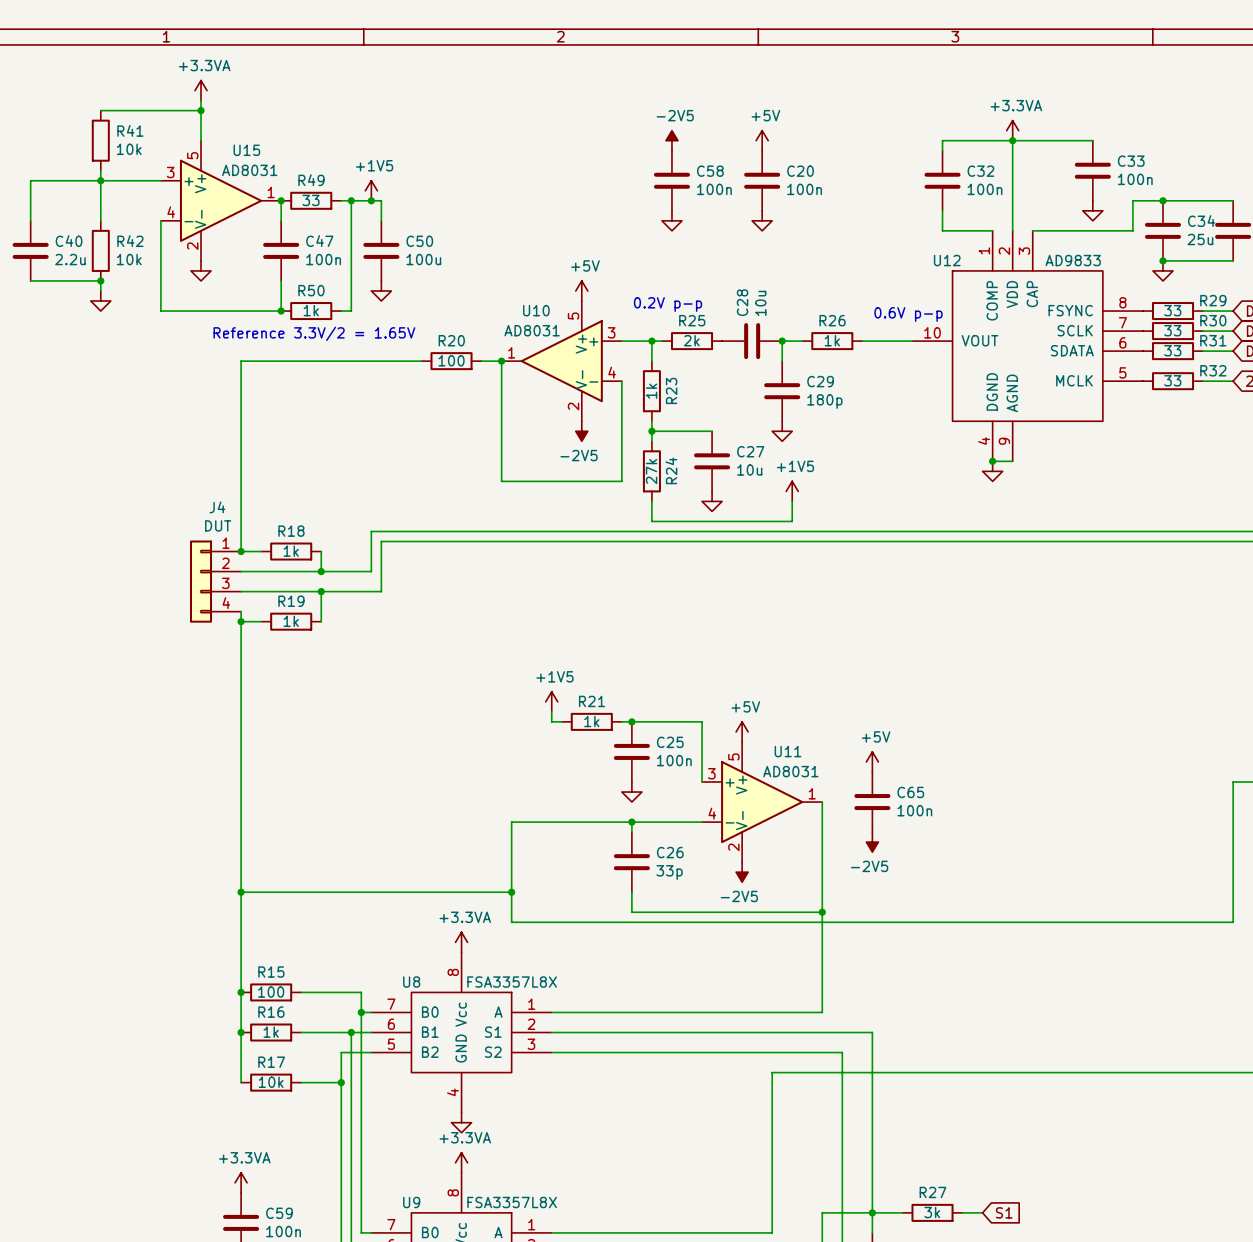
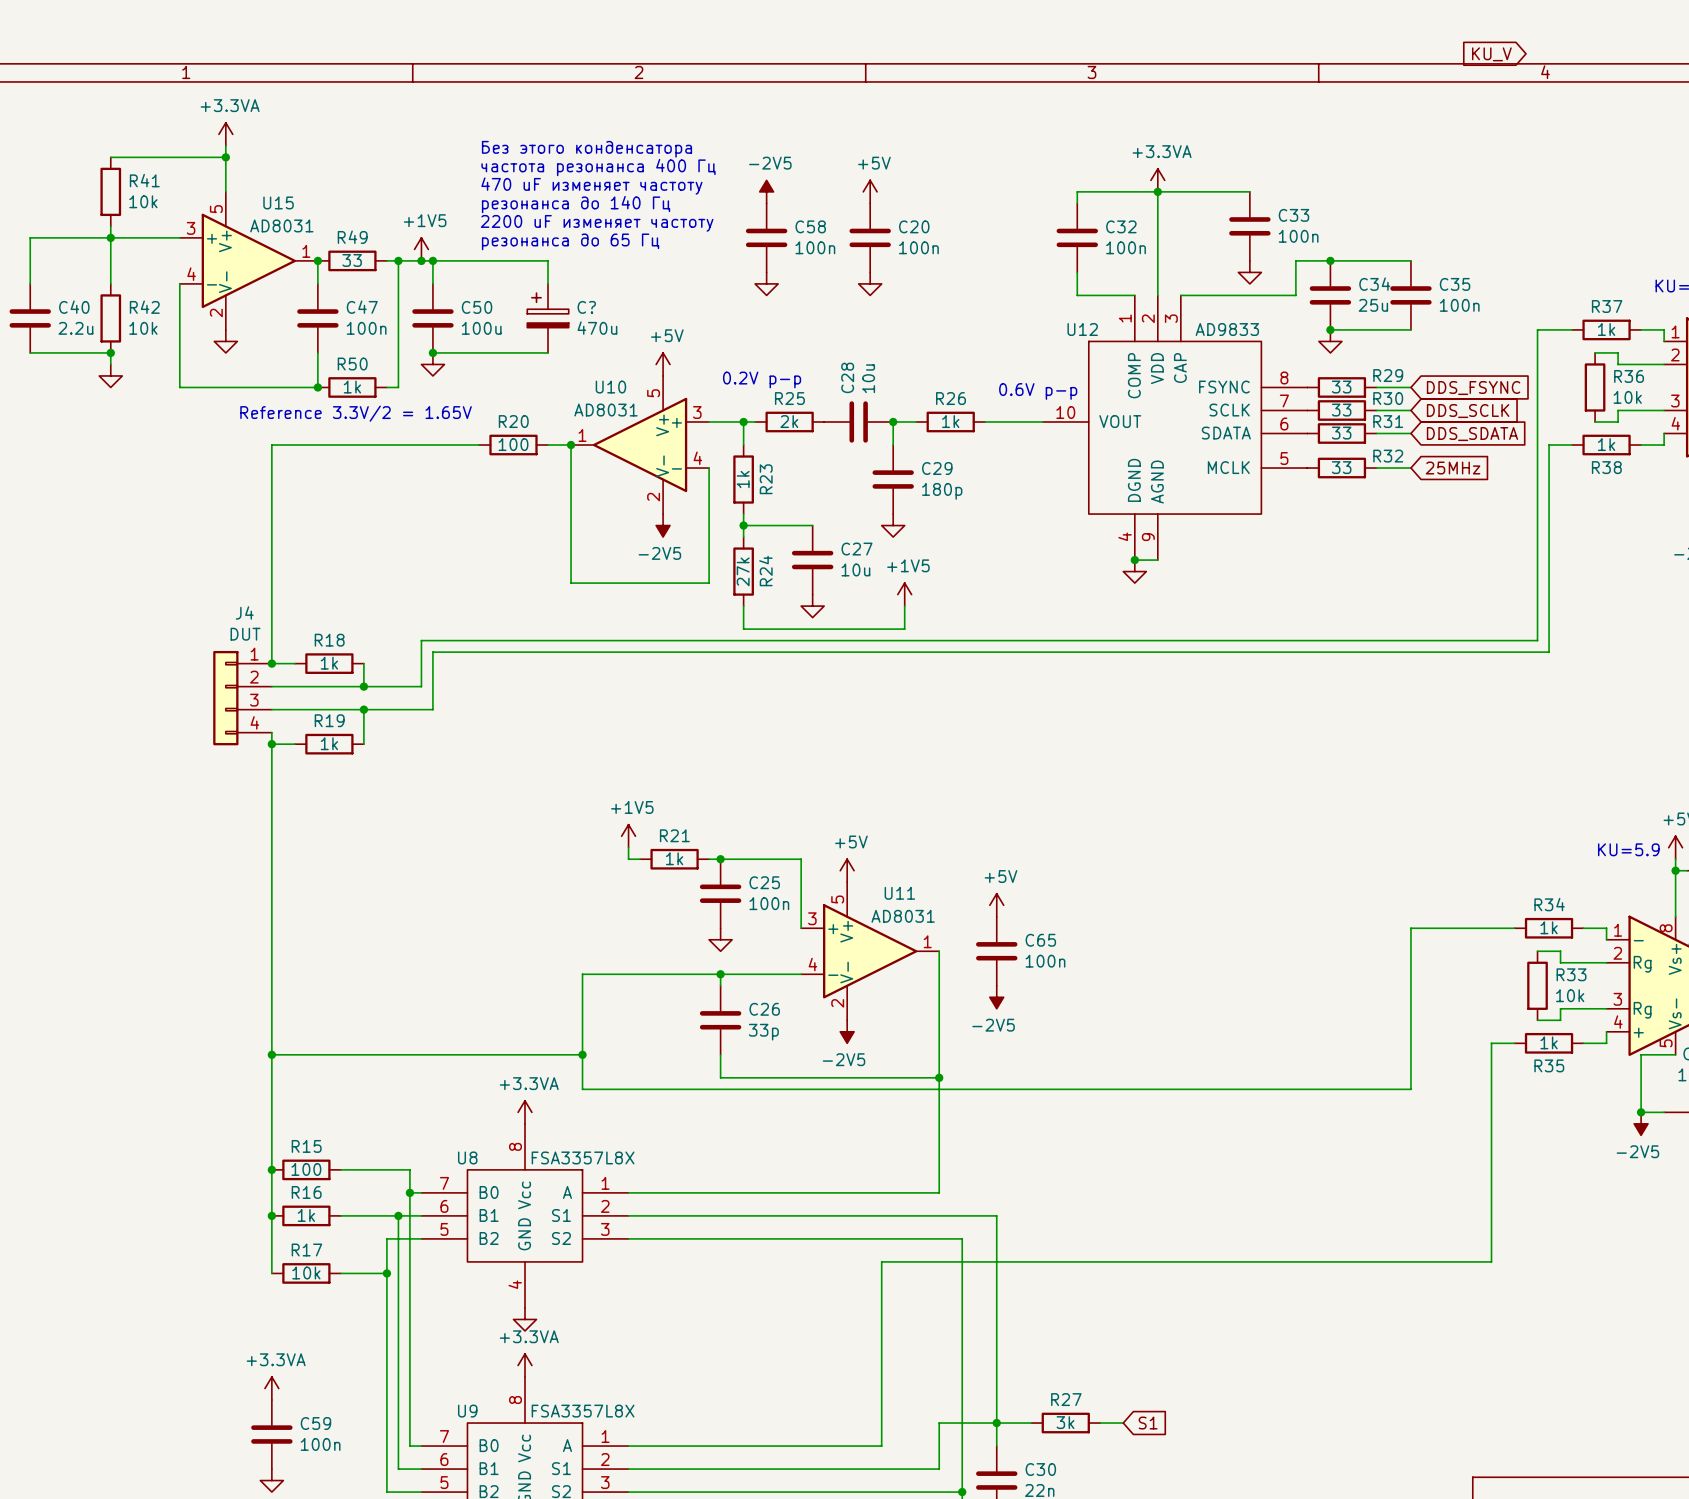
text: none -> Без этого конденсатора (586, 149)
text: none -> частота резонанса 400 Гц (598, 167)
text: none -> 470 uF изменяет частоту (591, 186)
text: none -> резонанса до 140 Гц (576, 204)
text: none -> 2200 uF изменяет частоту (597, 223)
text: none -> резонанса до 65 Гц (570, 241)
wire: none -> (432, 260) (548, 260) (548, 283)
junction: none -> (432, 260)
C?: none -> 470u (548, 318)
wire: none -> (432, 352) (548, 352)
junction: none -> (432, 352)

